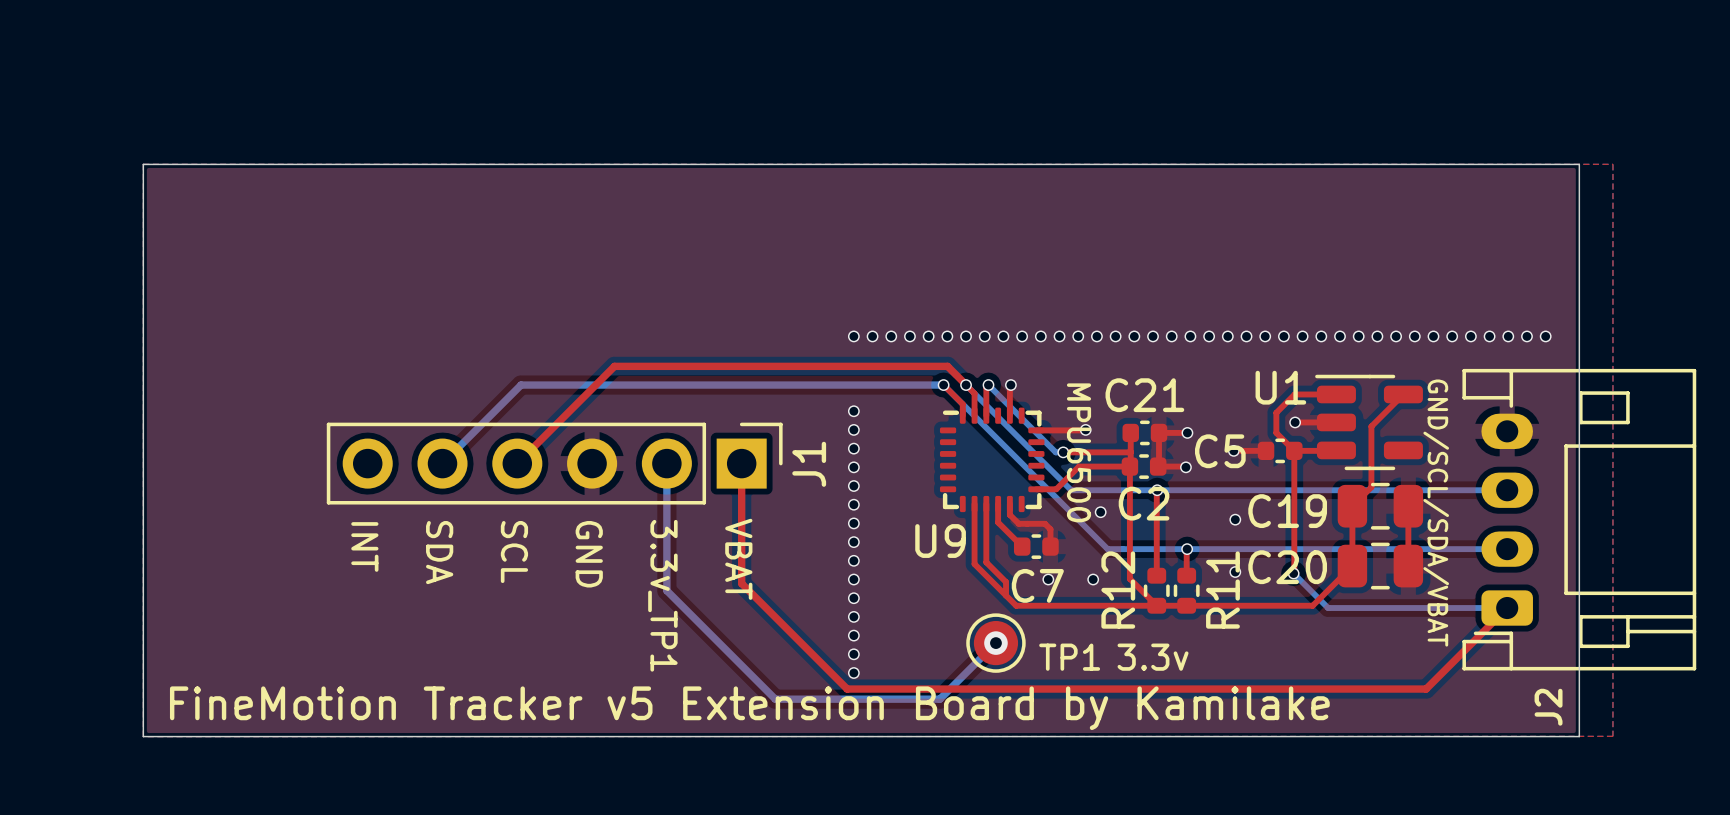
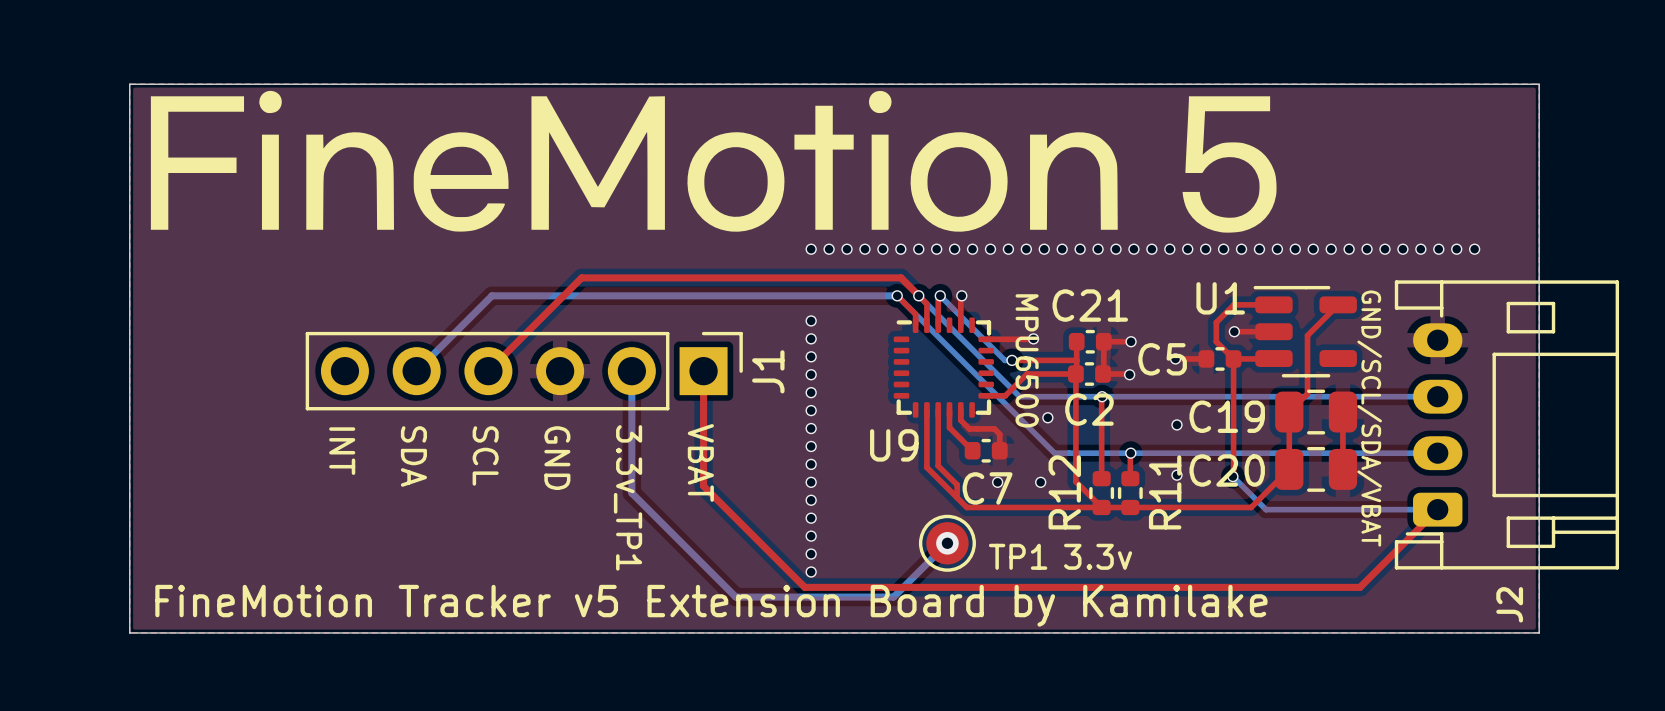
board edge: (1579, 164) (1579, 736) -> (1506, 84) (1539, 84) (1539, 632) (1506, 632)
drawing: none -> [150, 90, 1277, 233]
J2 name position: J2 (1548, 707) -> J2 (1509, 604)

